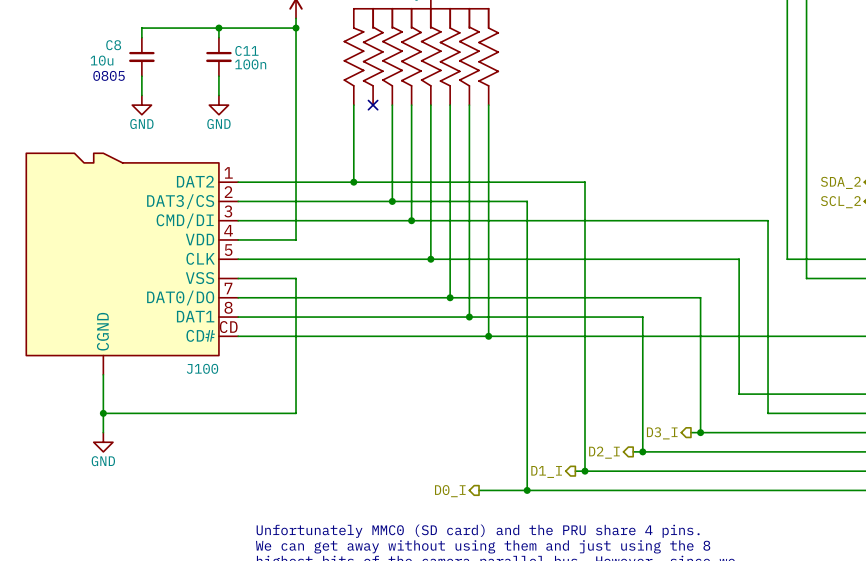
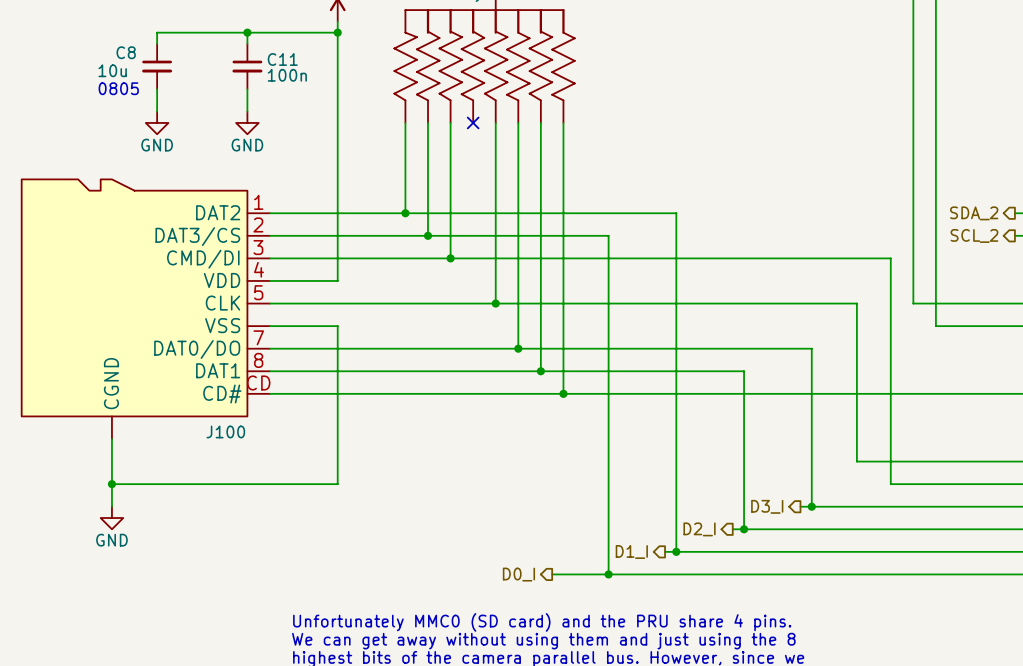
wire: none -> (428, 122) (428, 235)
no-connect mark position: (373, 105) -> (473, 122)
wire: (411, 105) (411, 220) -> none
junction: none -> (428, 235)
wire: none -> (450, 235) (450, 258)
junction: (392, 201) -> none
junction: none -> (450, 258)
junction: (411, 220) -> none

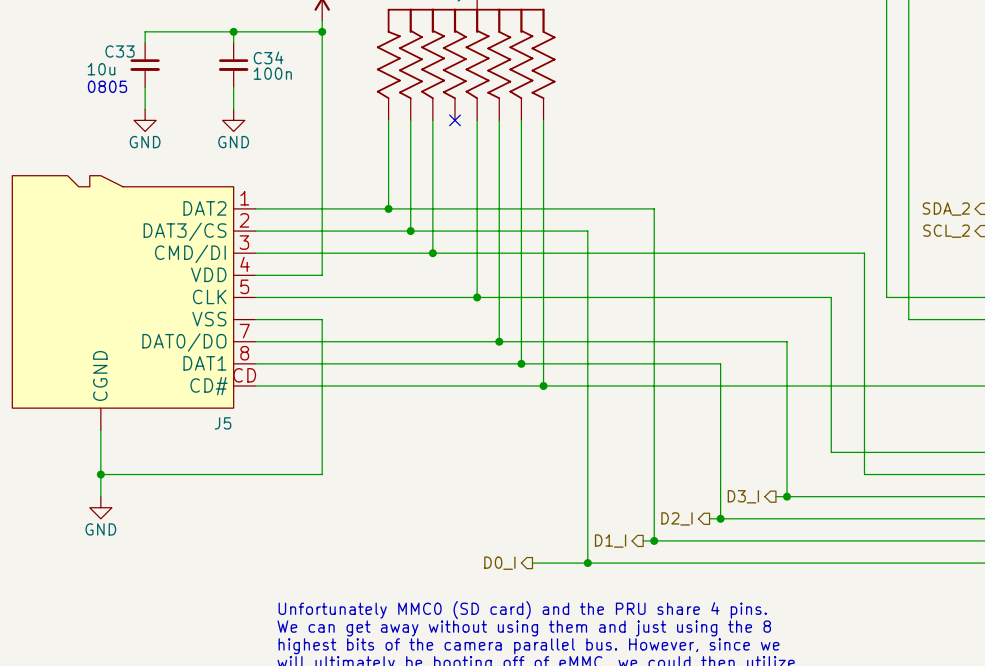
C8 name: C8 (126, 52) -> C33 (120, 51)
C11 name: C11 (282, 59) -> C34 (268, 57)
J100 name: J100 (225, 431) -> J5 (223, 423)

